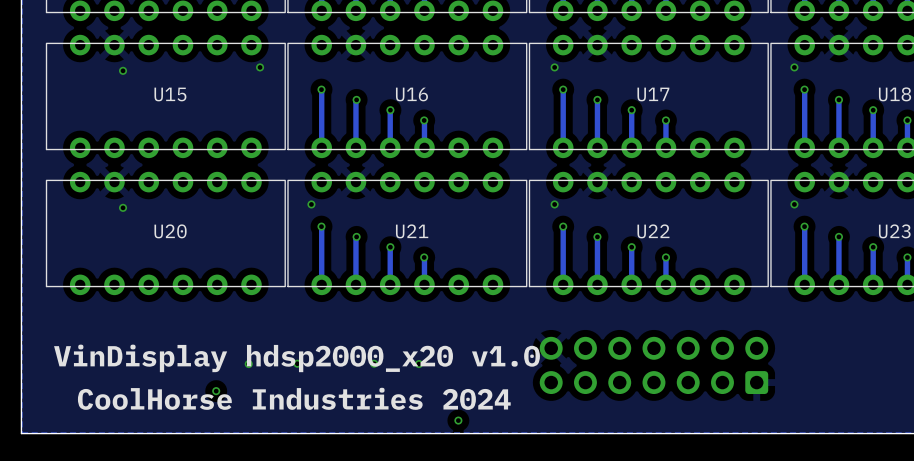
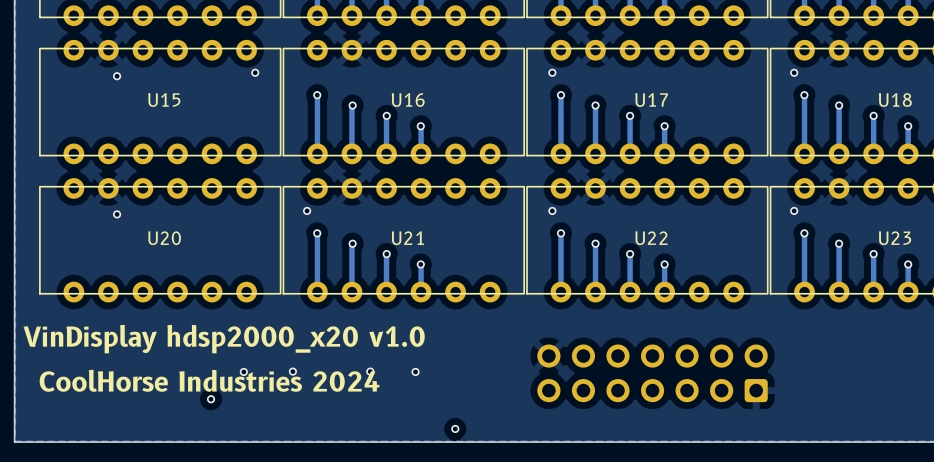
text position: VinDisplay hdsp2000_x20 v1.0 (297, 358) -> VinDisplay hdsp2000_x20 v1.0 (224, 339)
text position: CoolHorse Industries 2024 (294, 398) -> CoolHorse Industries 2024 (209, 380)

